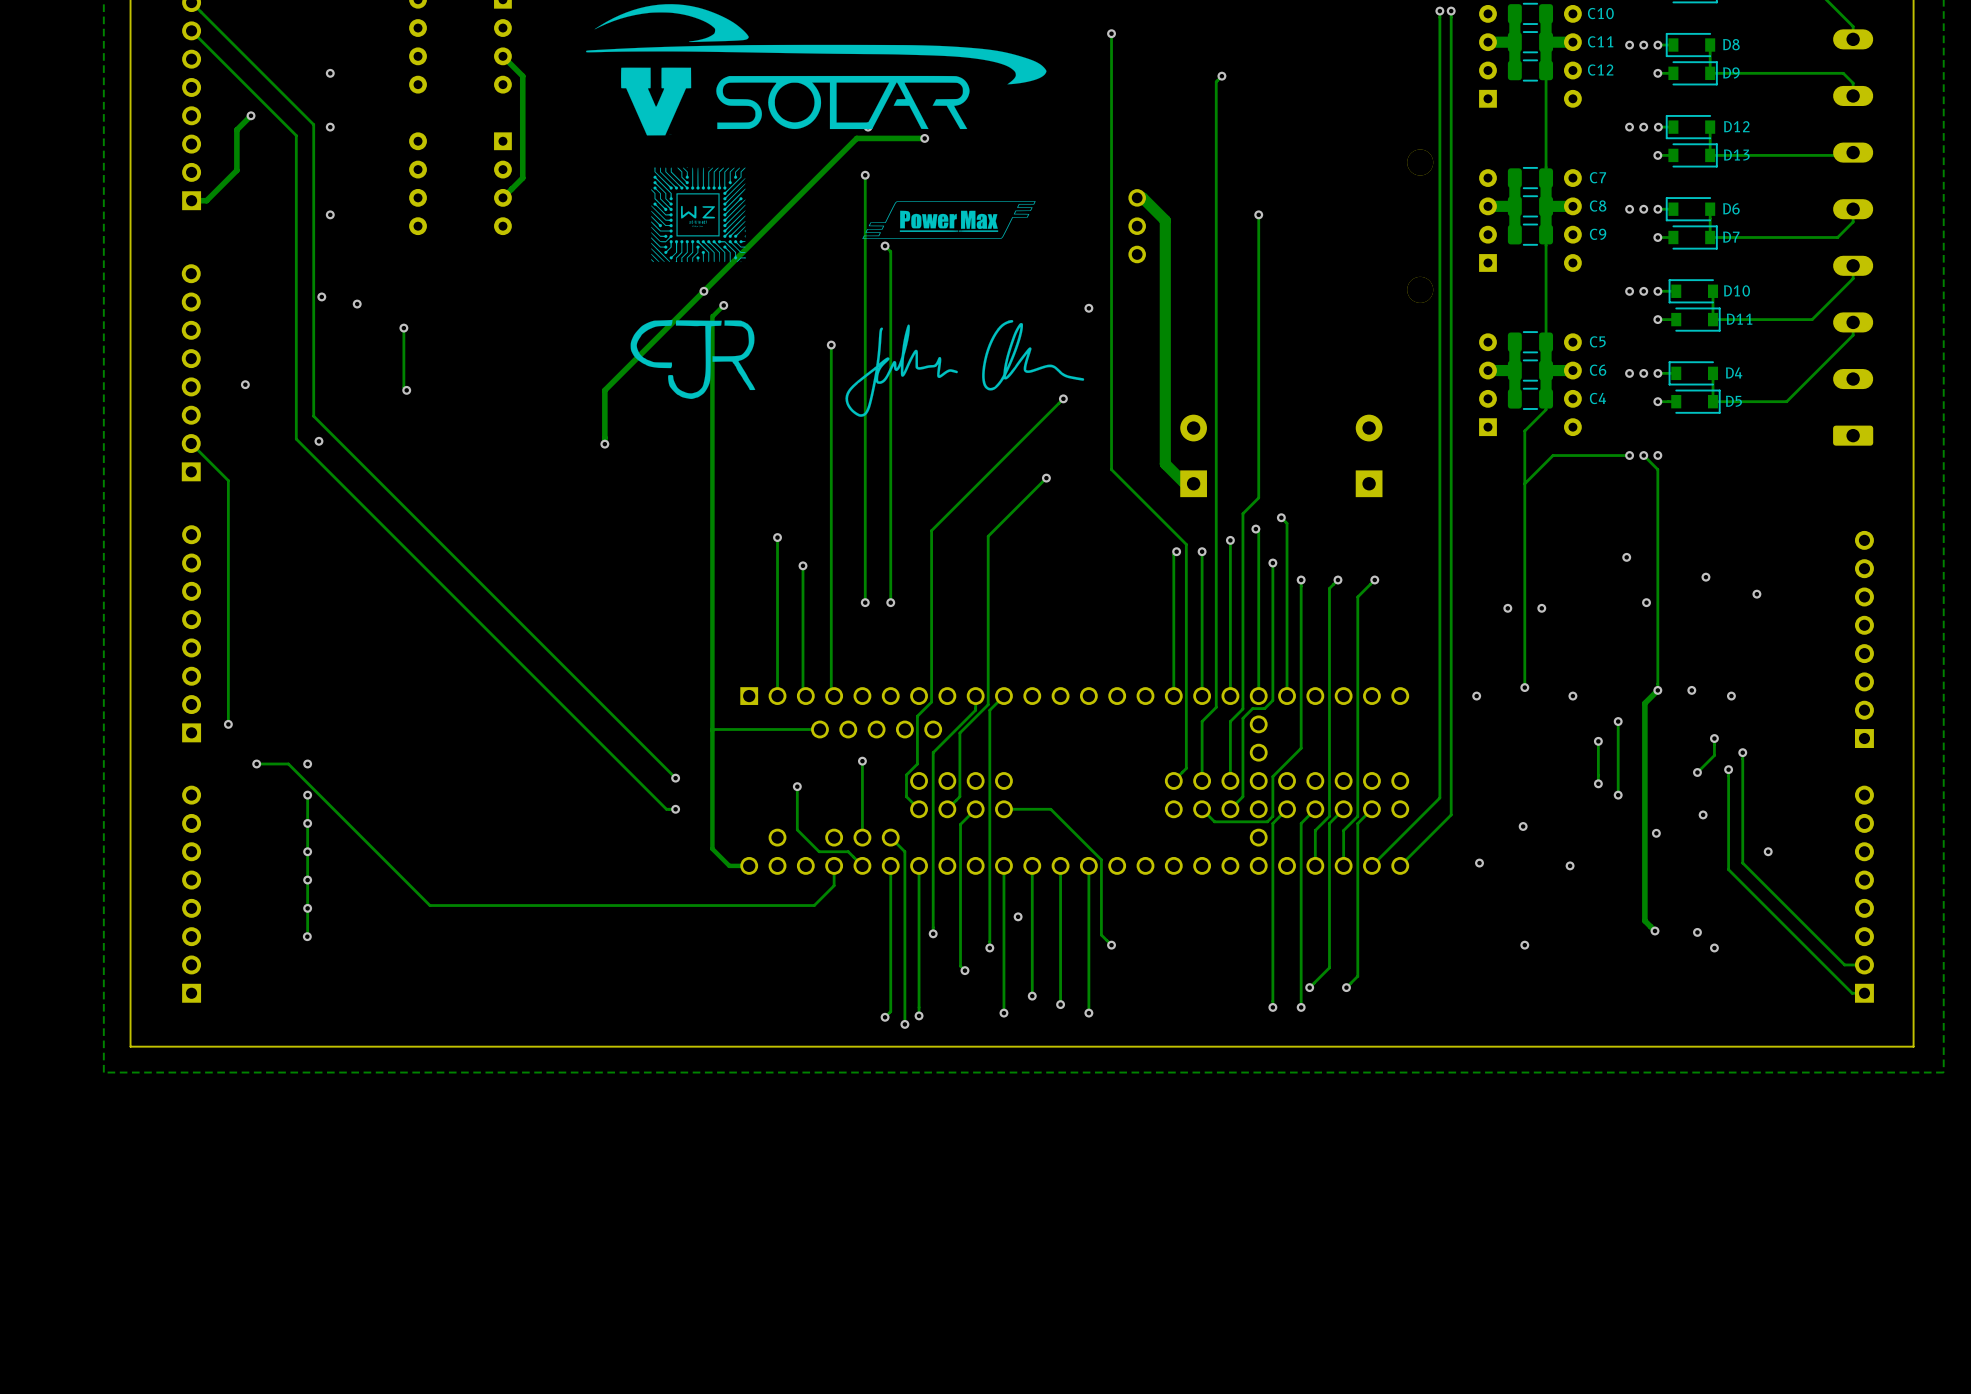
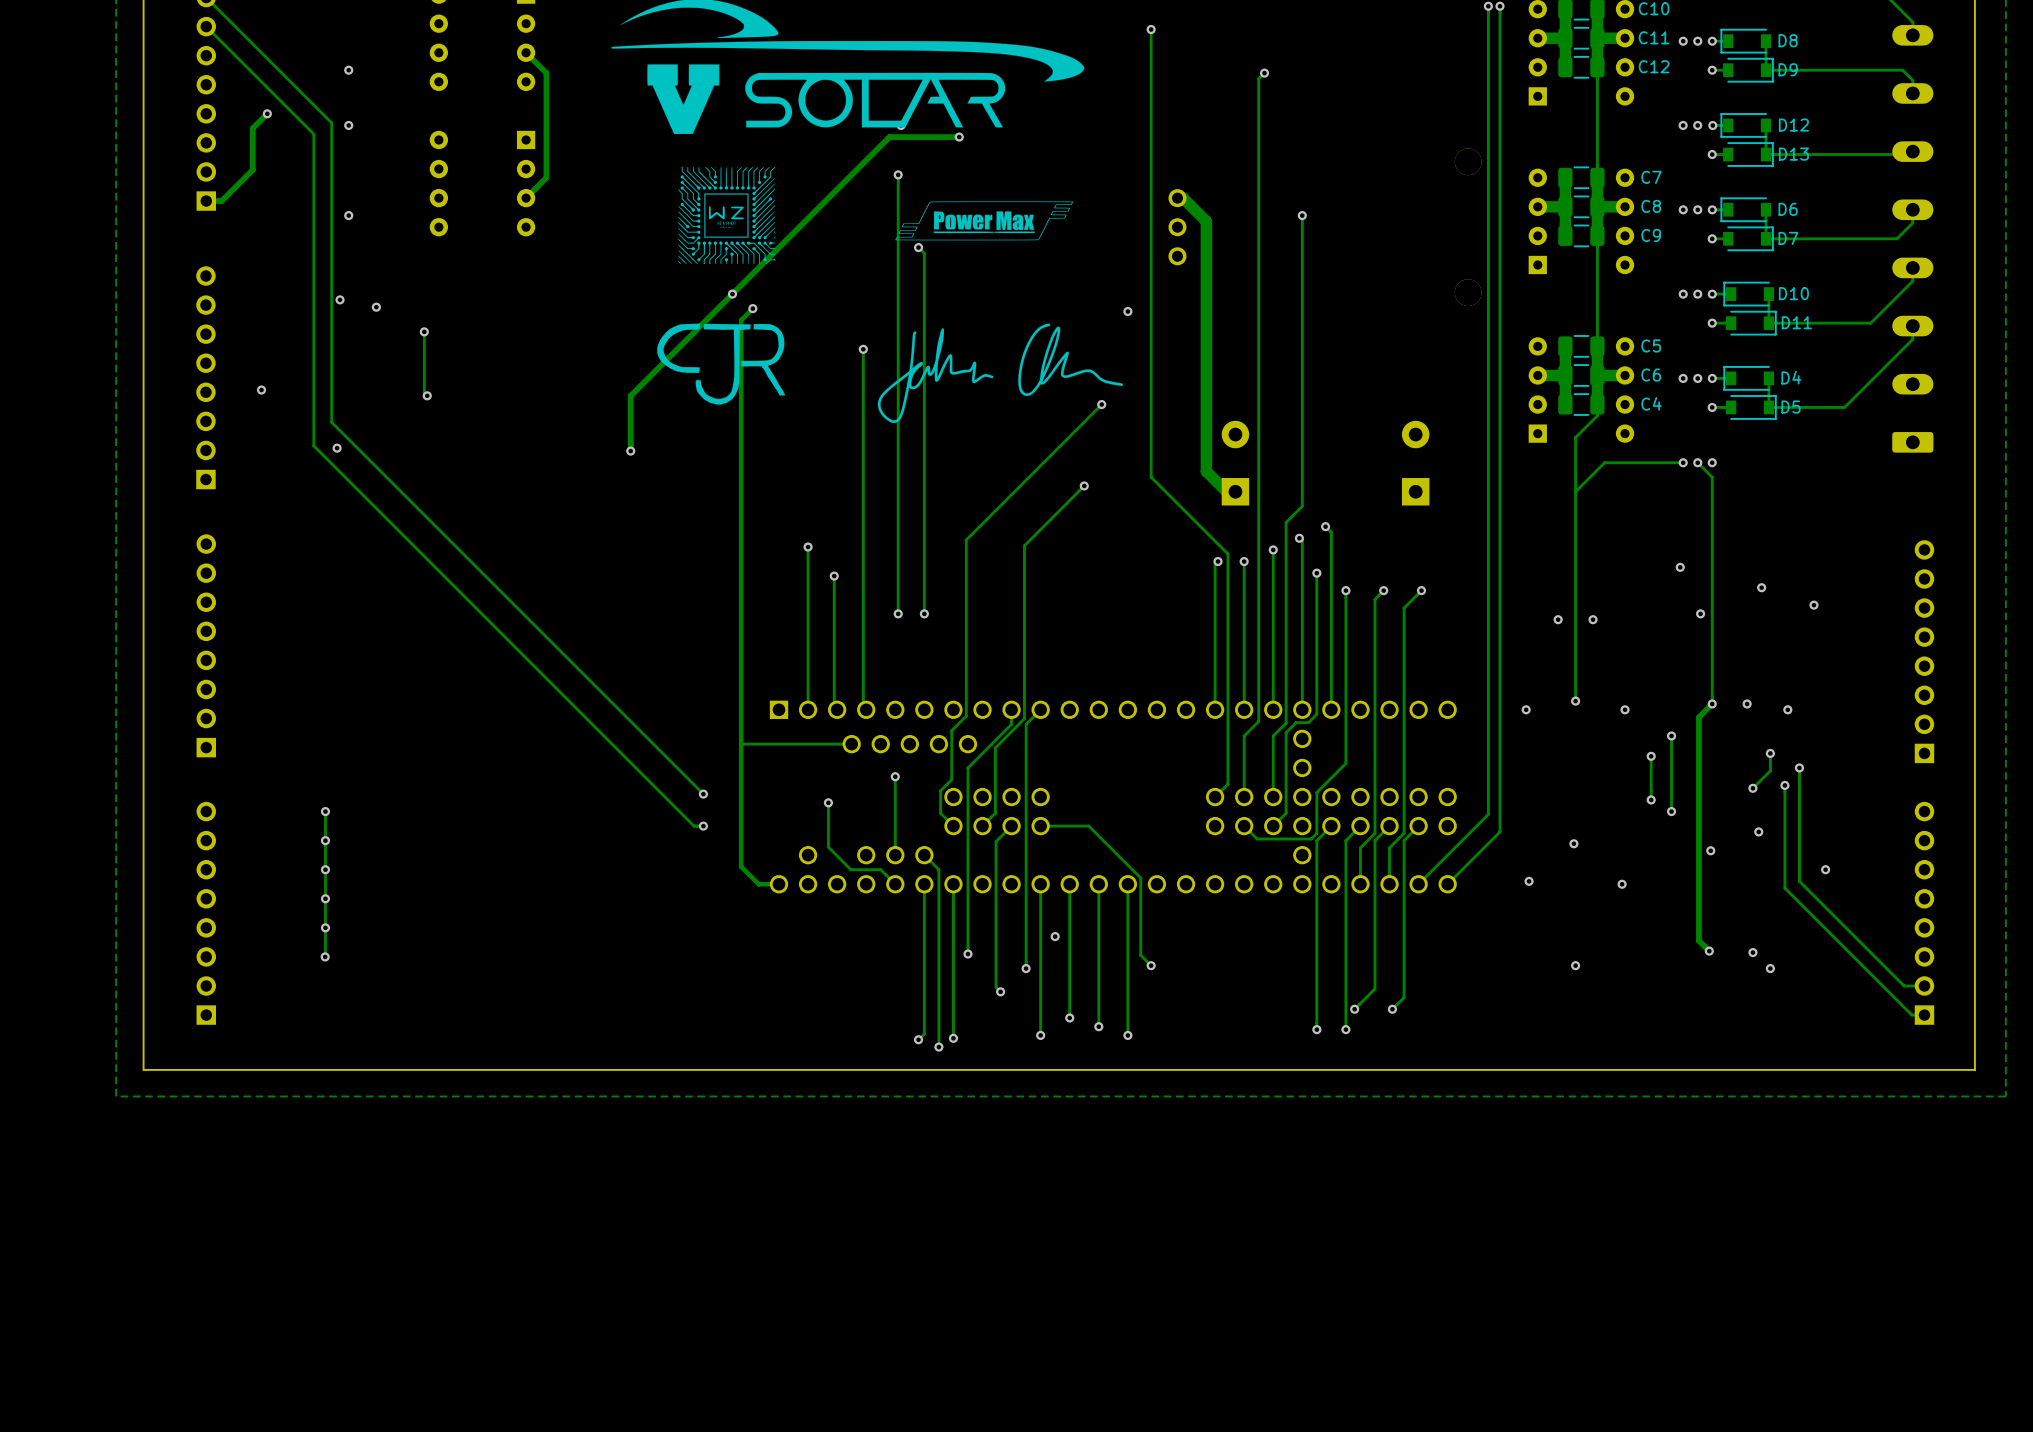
track: (191, 443) (228, 480) (228, 724) -> none
via: (228, 724) -> none
track: (256, 763) (288, 763) (429, 905) (814, 905) (834, 885) (834, 865) -> none
via: (256, 763) -> none
via: (307, 763) -> none

